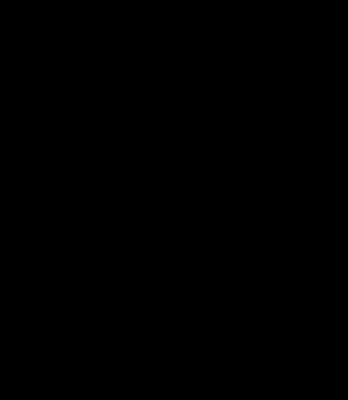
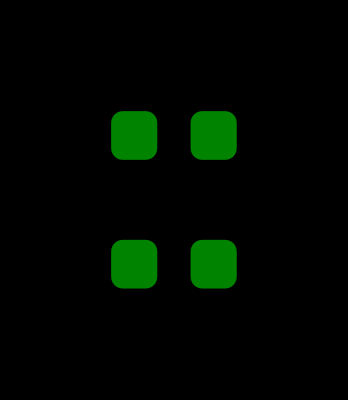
part: none -> (173, 135)
part: none -> (173, 264)

